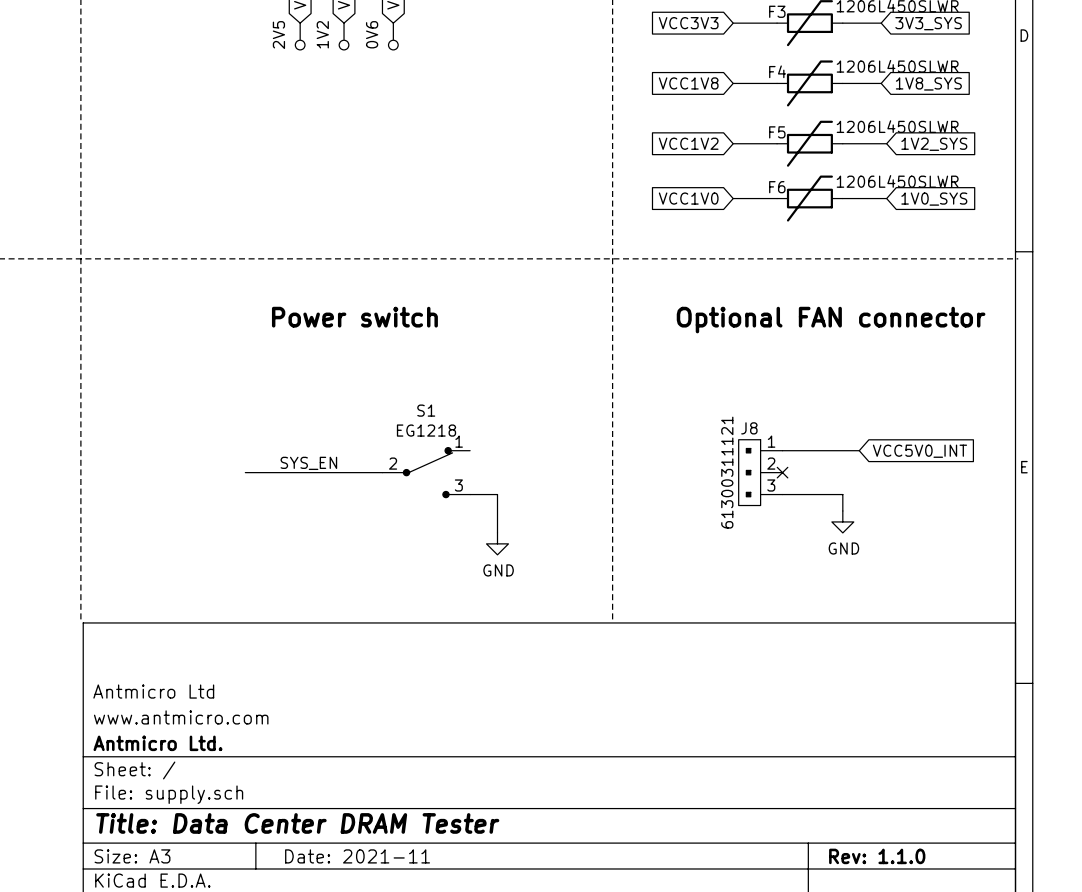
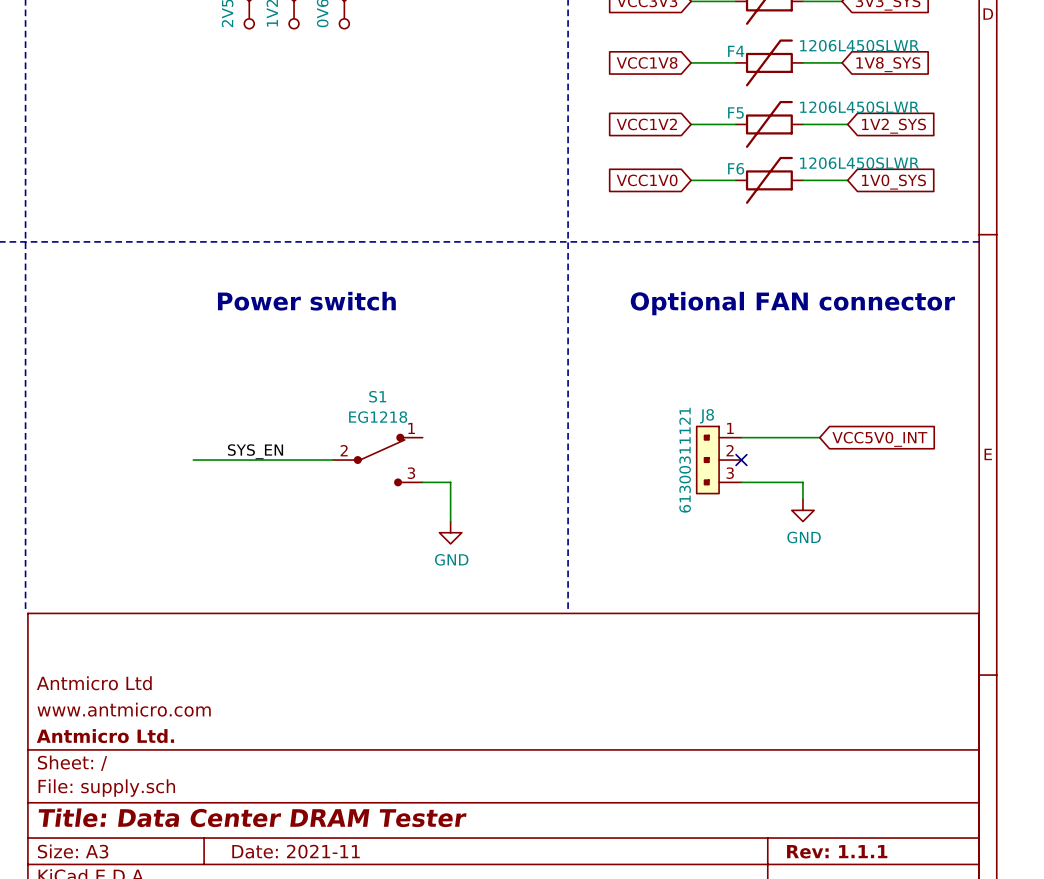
title block: Rev: 1.1.0 (877, 856) -> Rev: 1.1.1 (837, 851)

